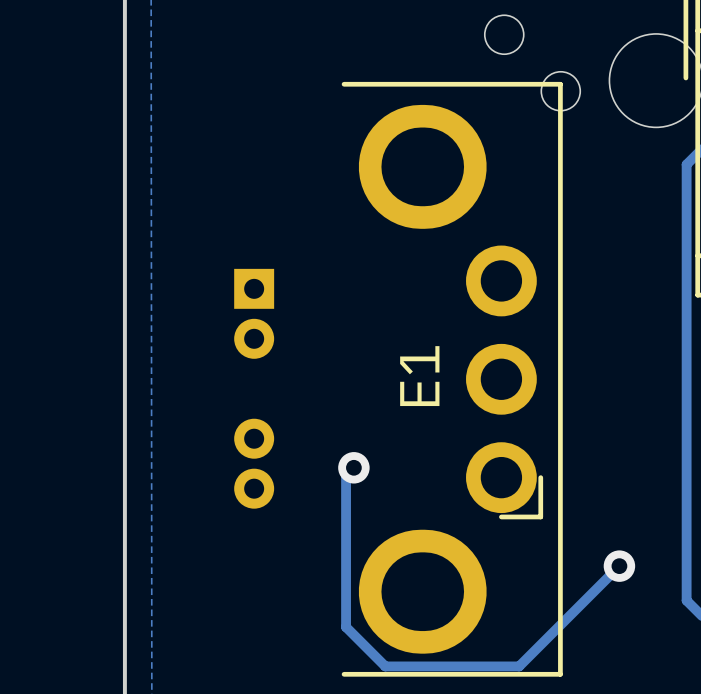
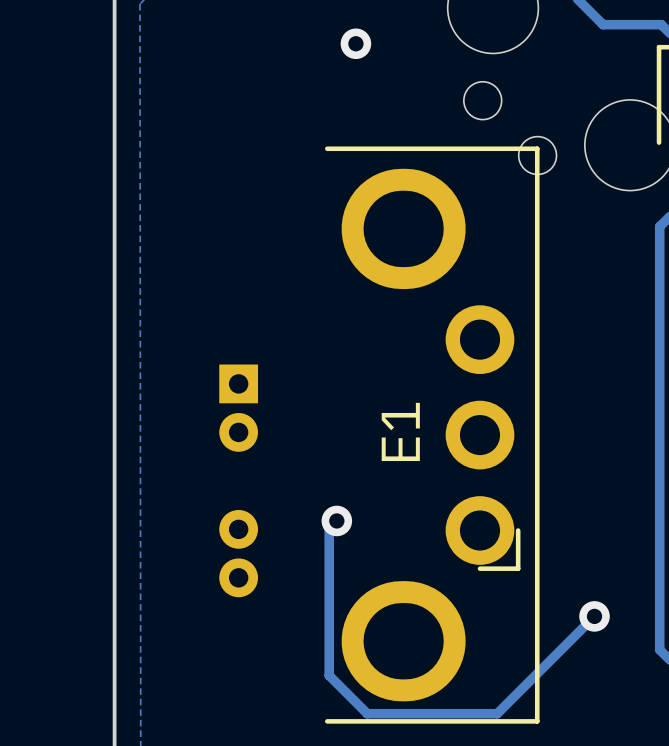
part position: (254, 388) -> (238, 480)

